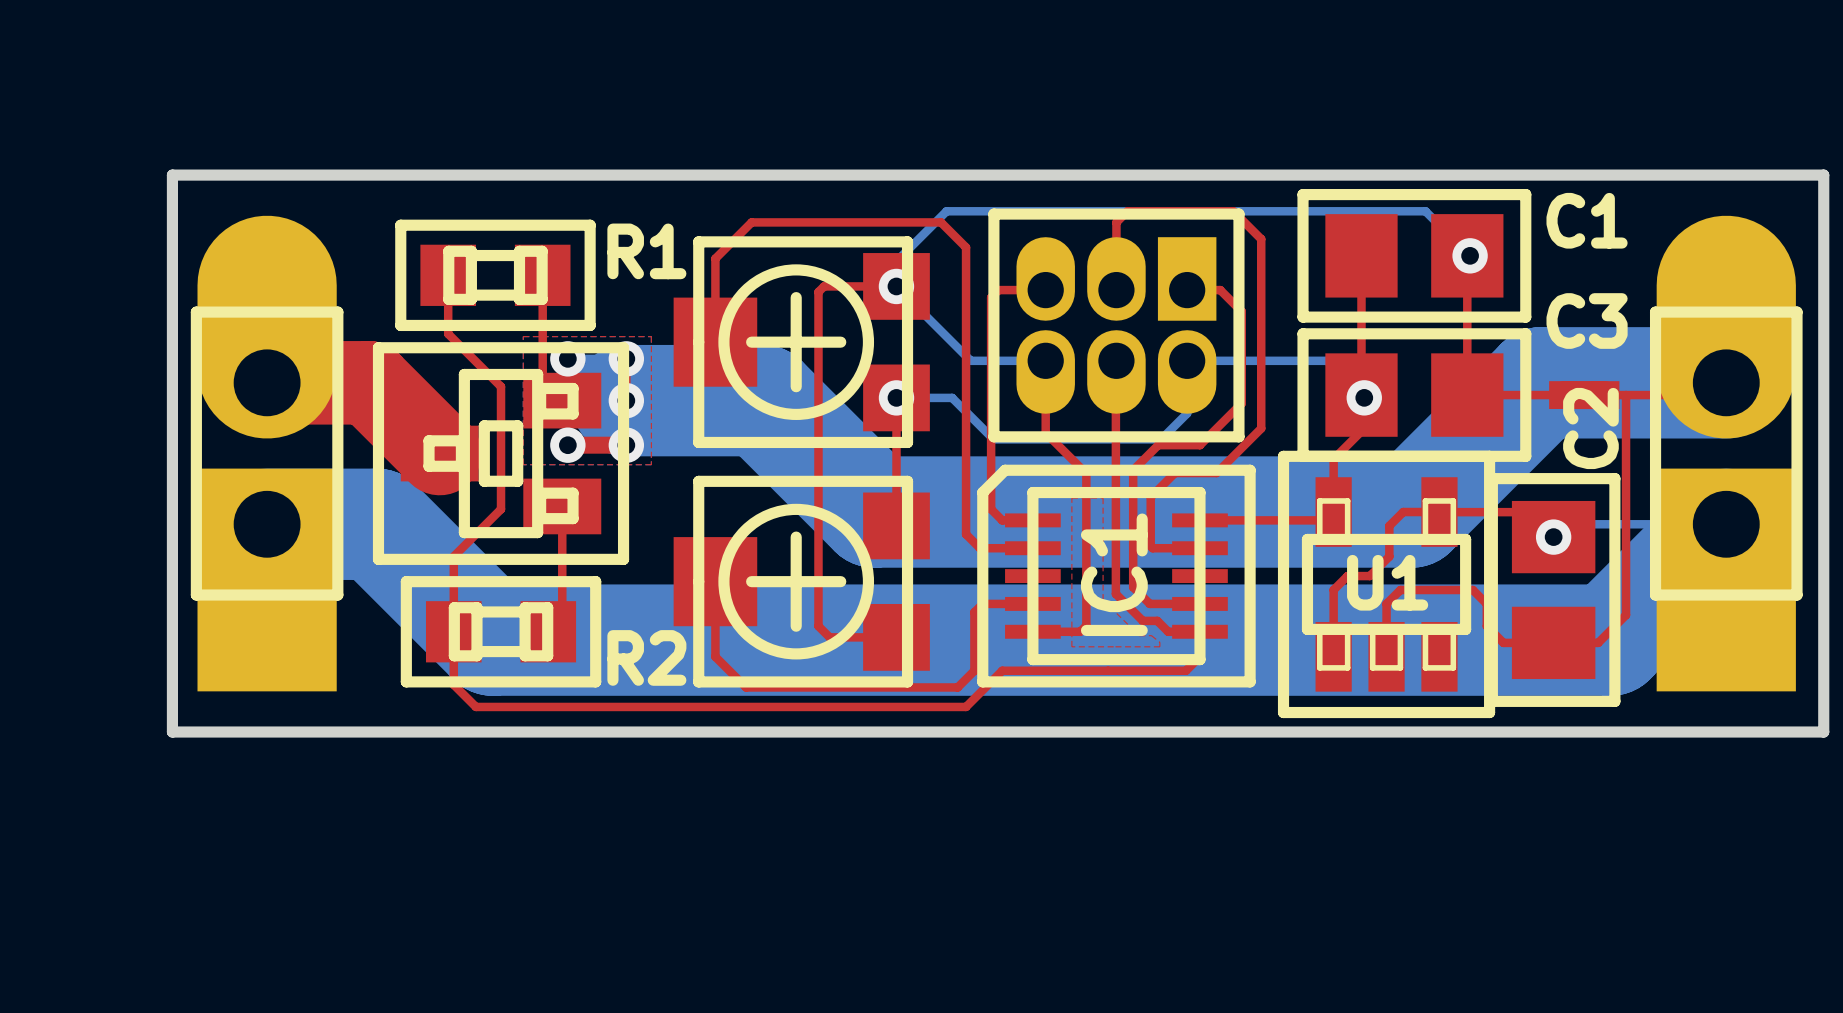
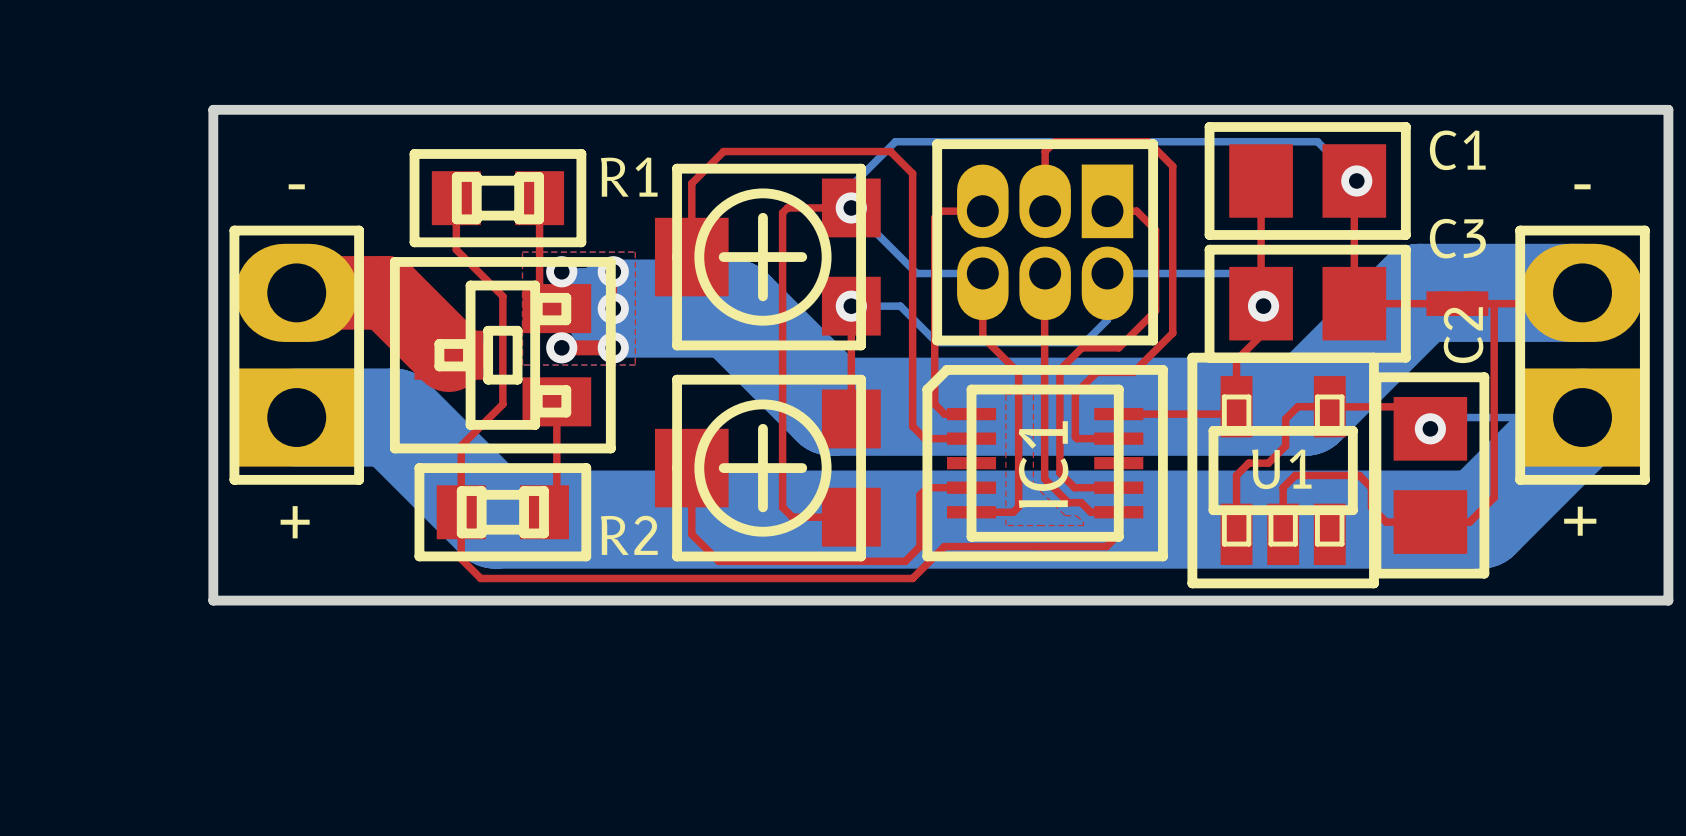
part footprint: [190, 215, 344, 692] -> [229, 225, 364, 485]
part footprint: [1649, 215, 1803, 692] -> [1515, 225, 1650, 485]
text: none -> - (296, 186)
text: none -> - (1582, 186)
text: none -> + (1580, 521)
text: none -> + (295, 522)

